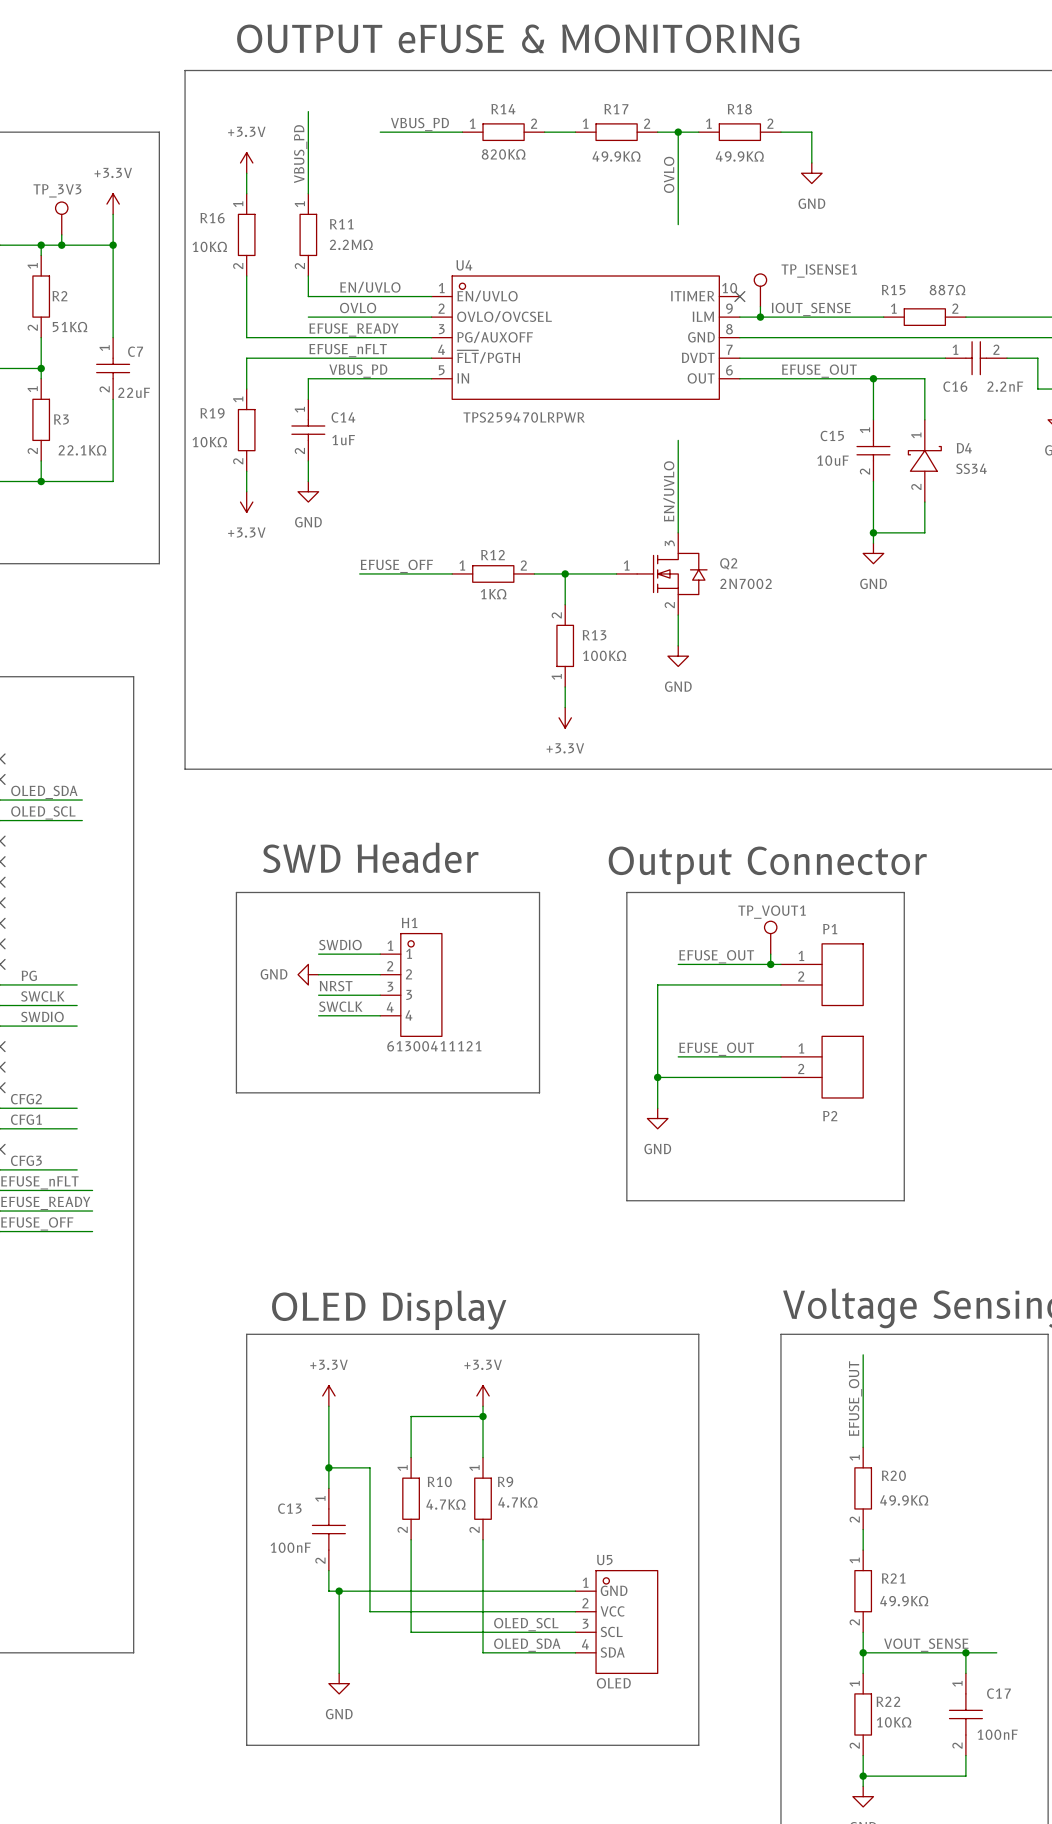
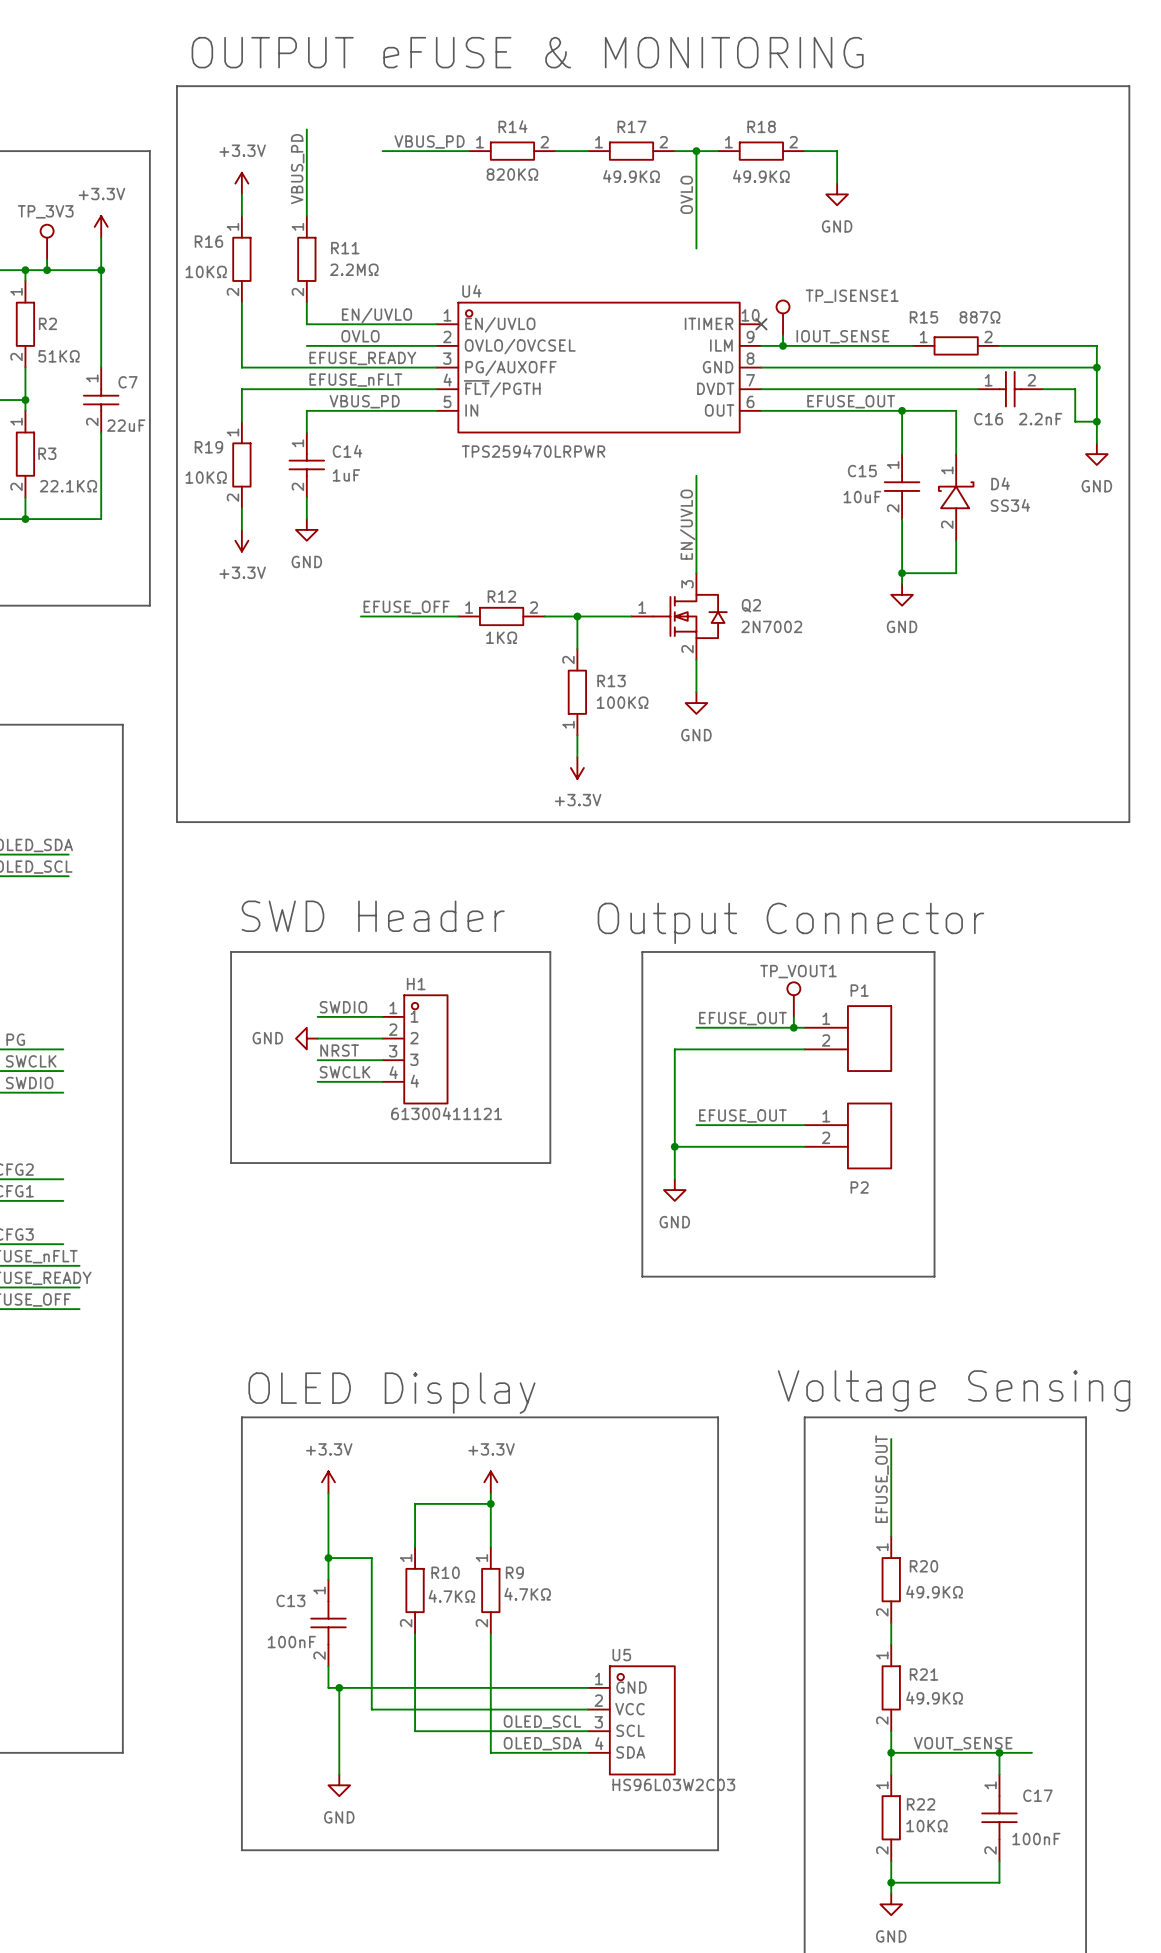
U5 value: OLED (613, 1683) -> HS96L03W2C03 (673, 1784)

